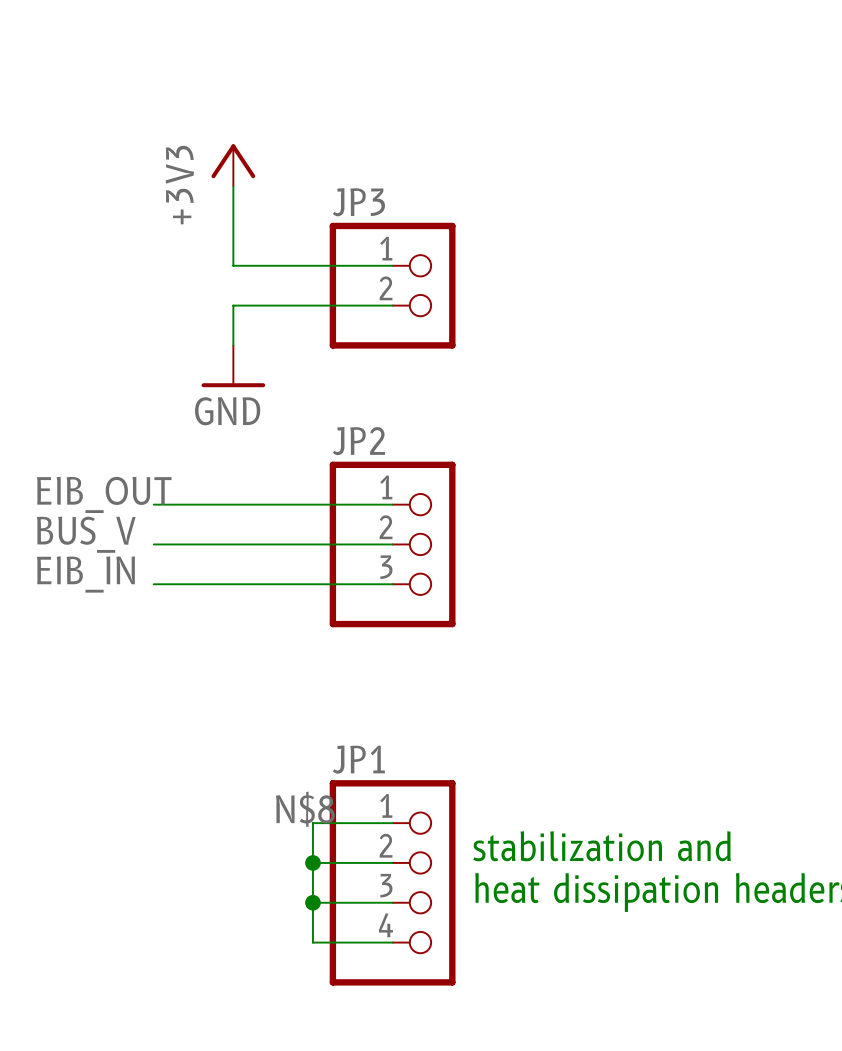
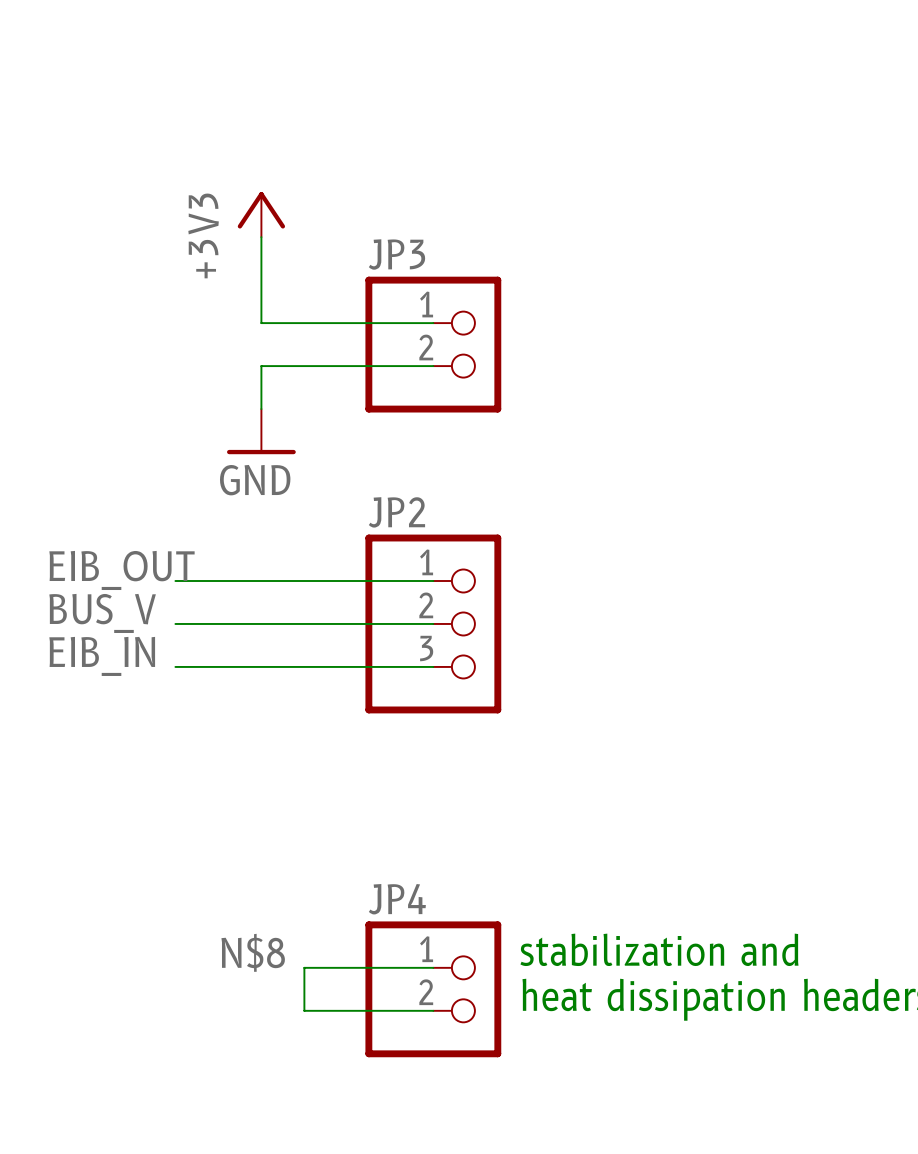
label position: N$8 (305, 809) -> N$8 (253, 952)
wire: (392, 823) (312, 823) (312, 942) (392, 942) -> none
wire: none -> (347, 967) (304, 967) (304, 1010) (347, 1010)
junction: (312, 862) -> none
JP1: (392, 882) -> none
JP4: none -> (433, 989)
junction: (312, 902) -> none

